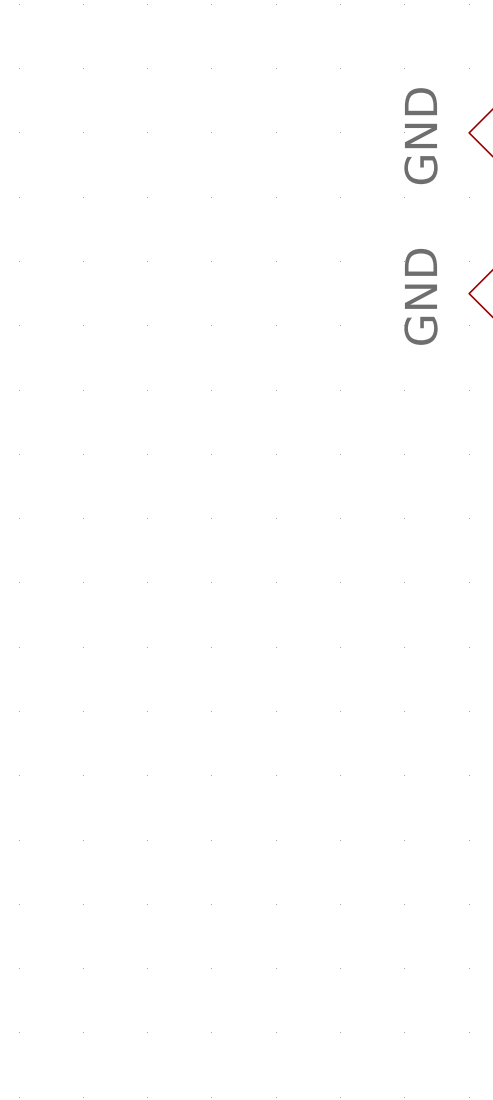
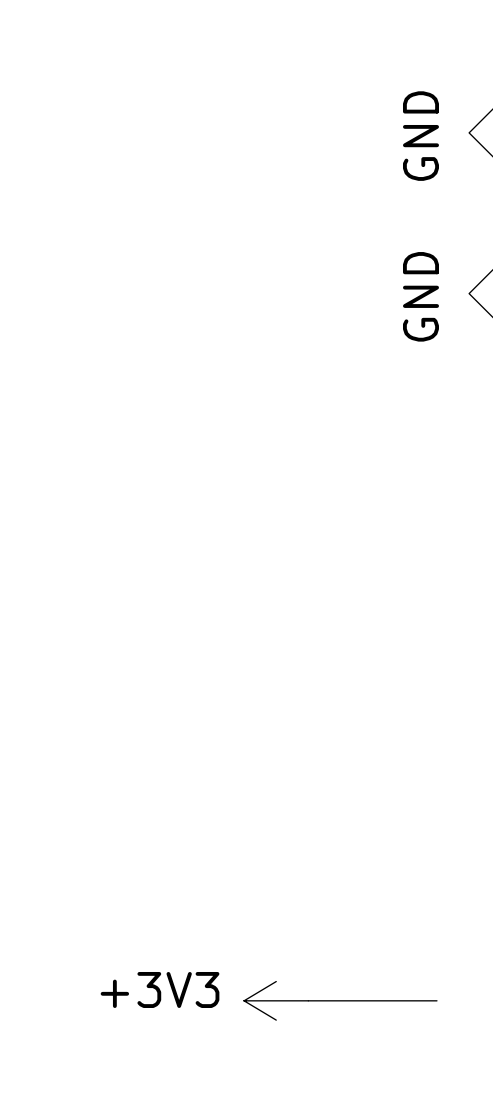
power symbol: none -> +3V3 (276, 1000)
wire: none -> (308, 1000) (436, 1000)

